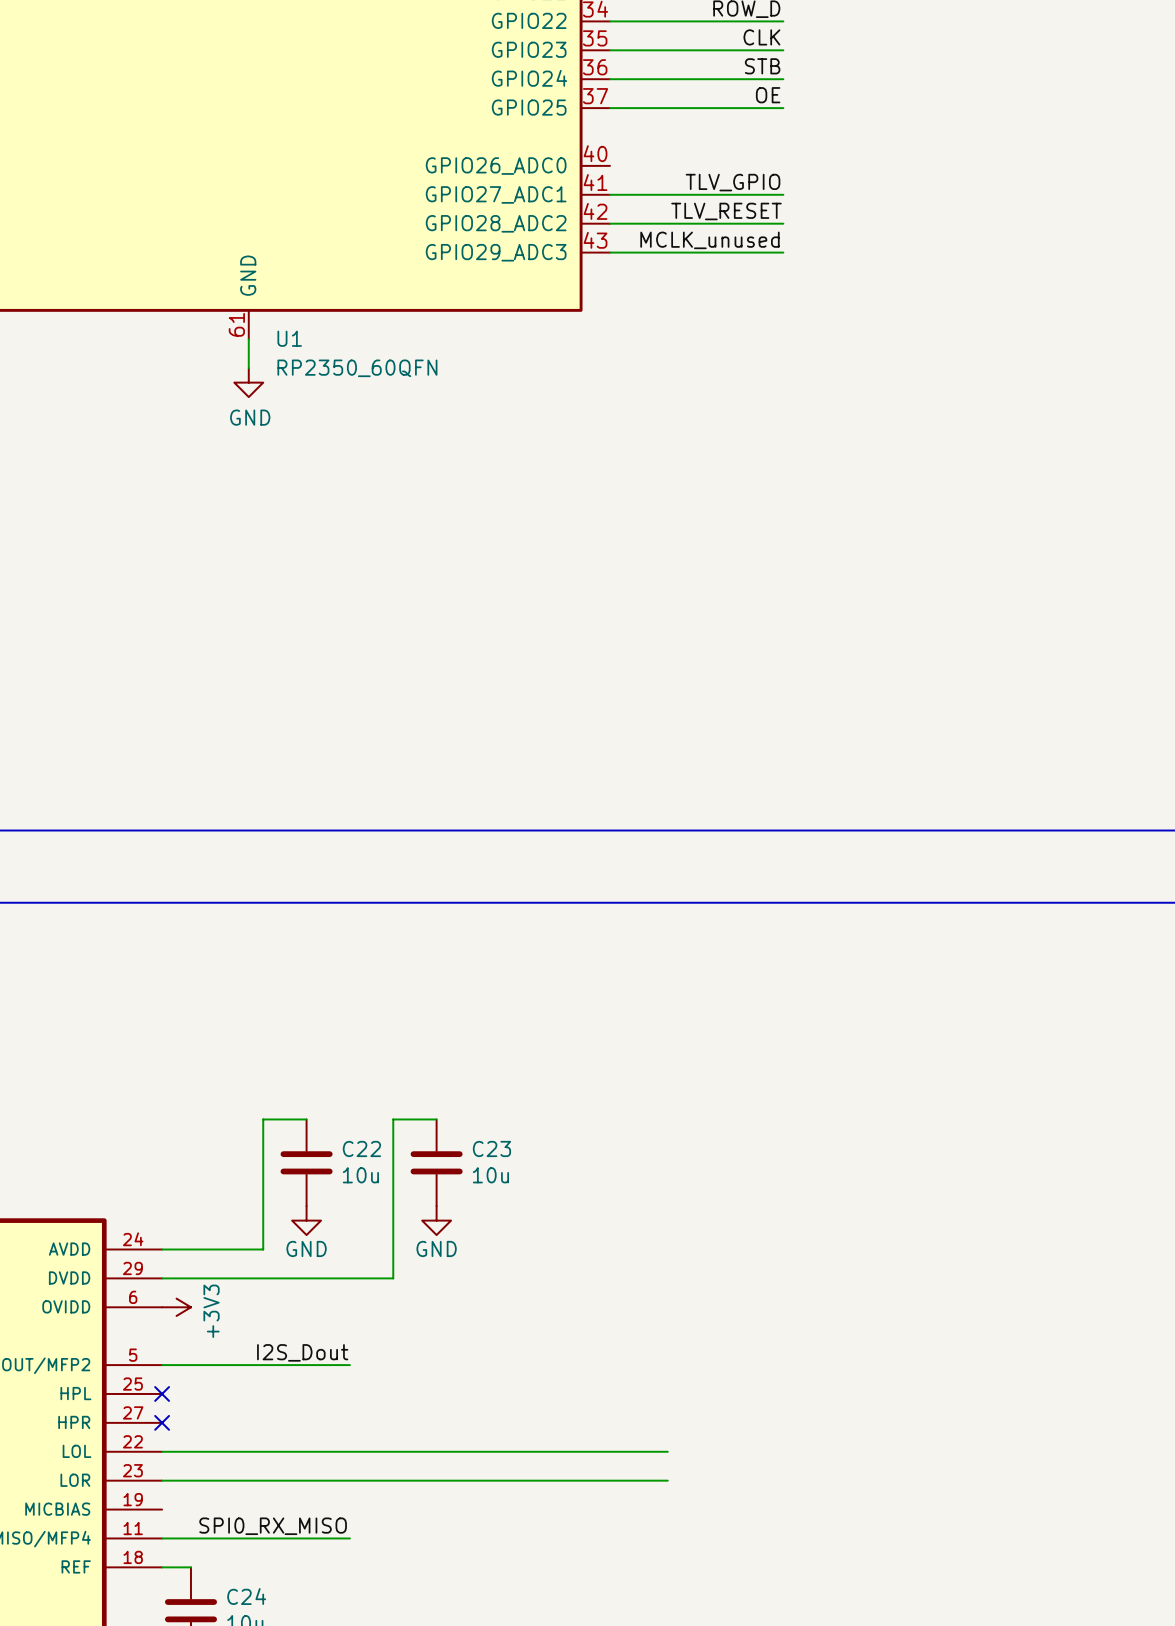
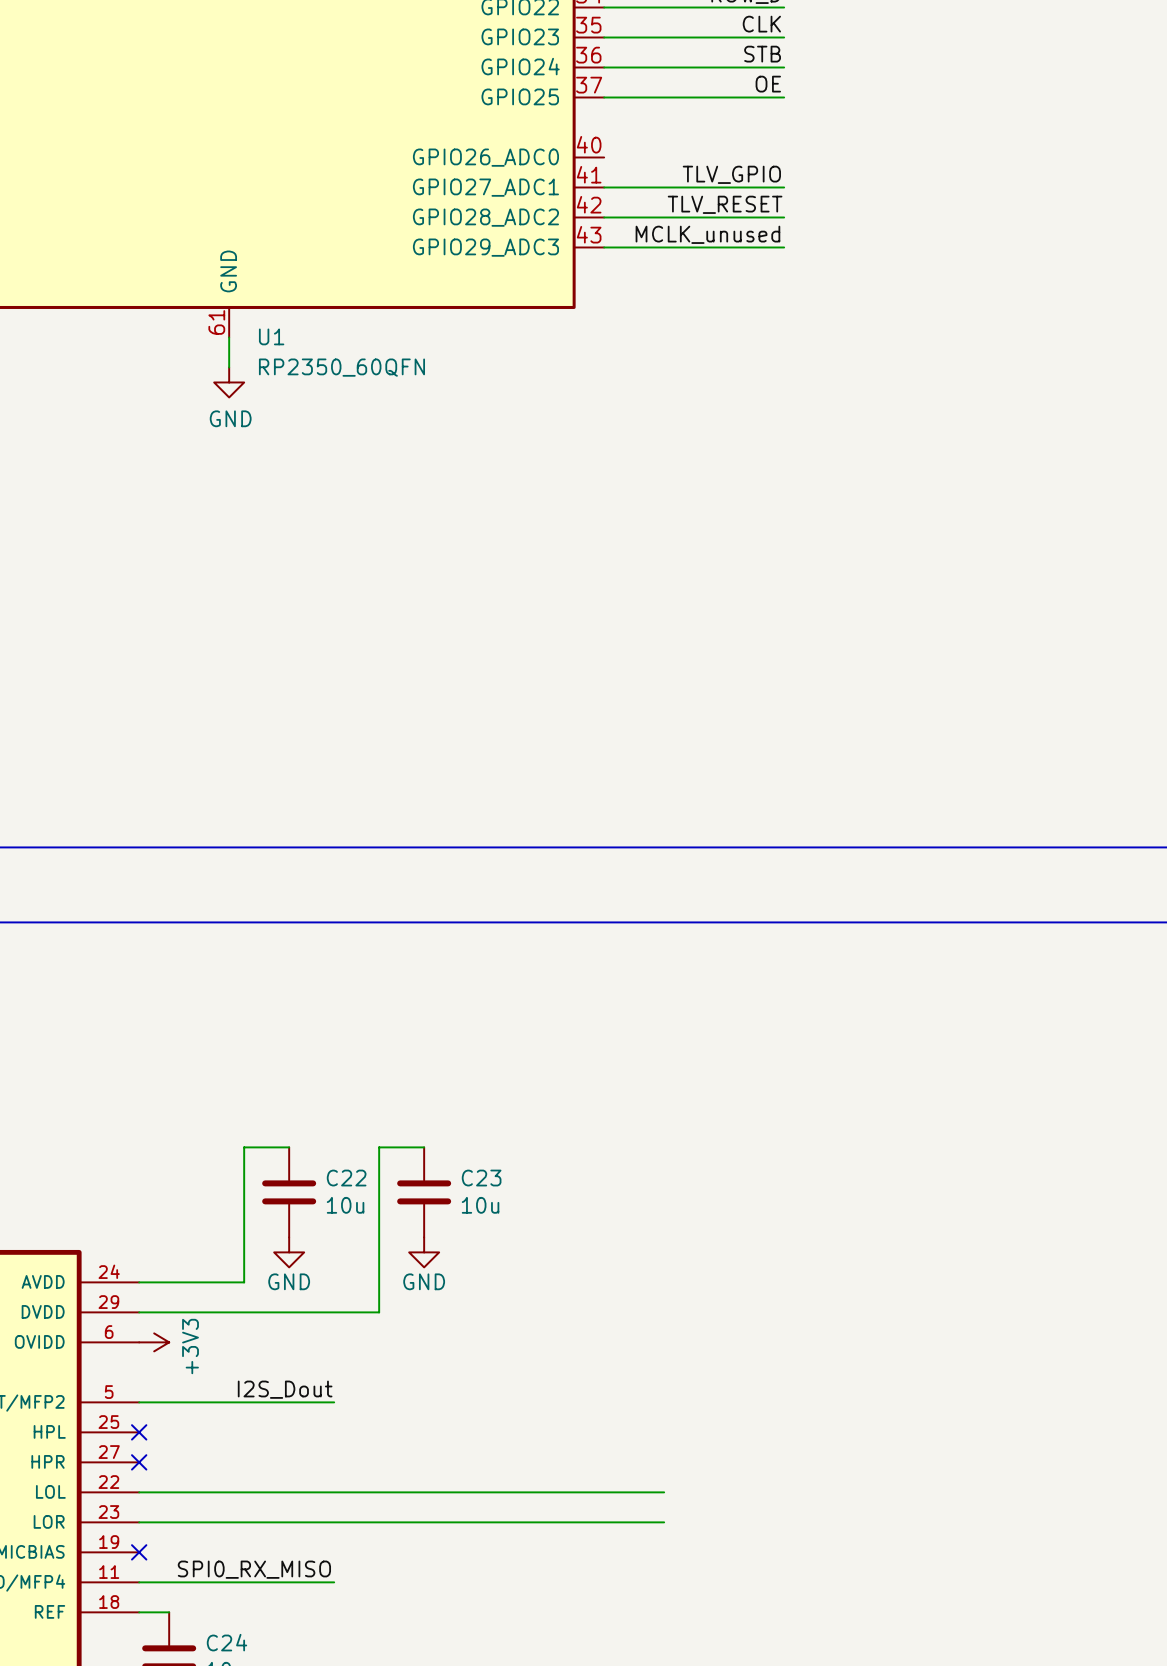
no-connect mark: none -> (139, 1552)

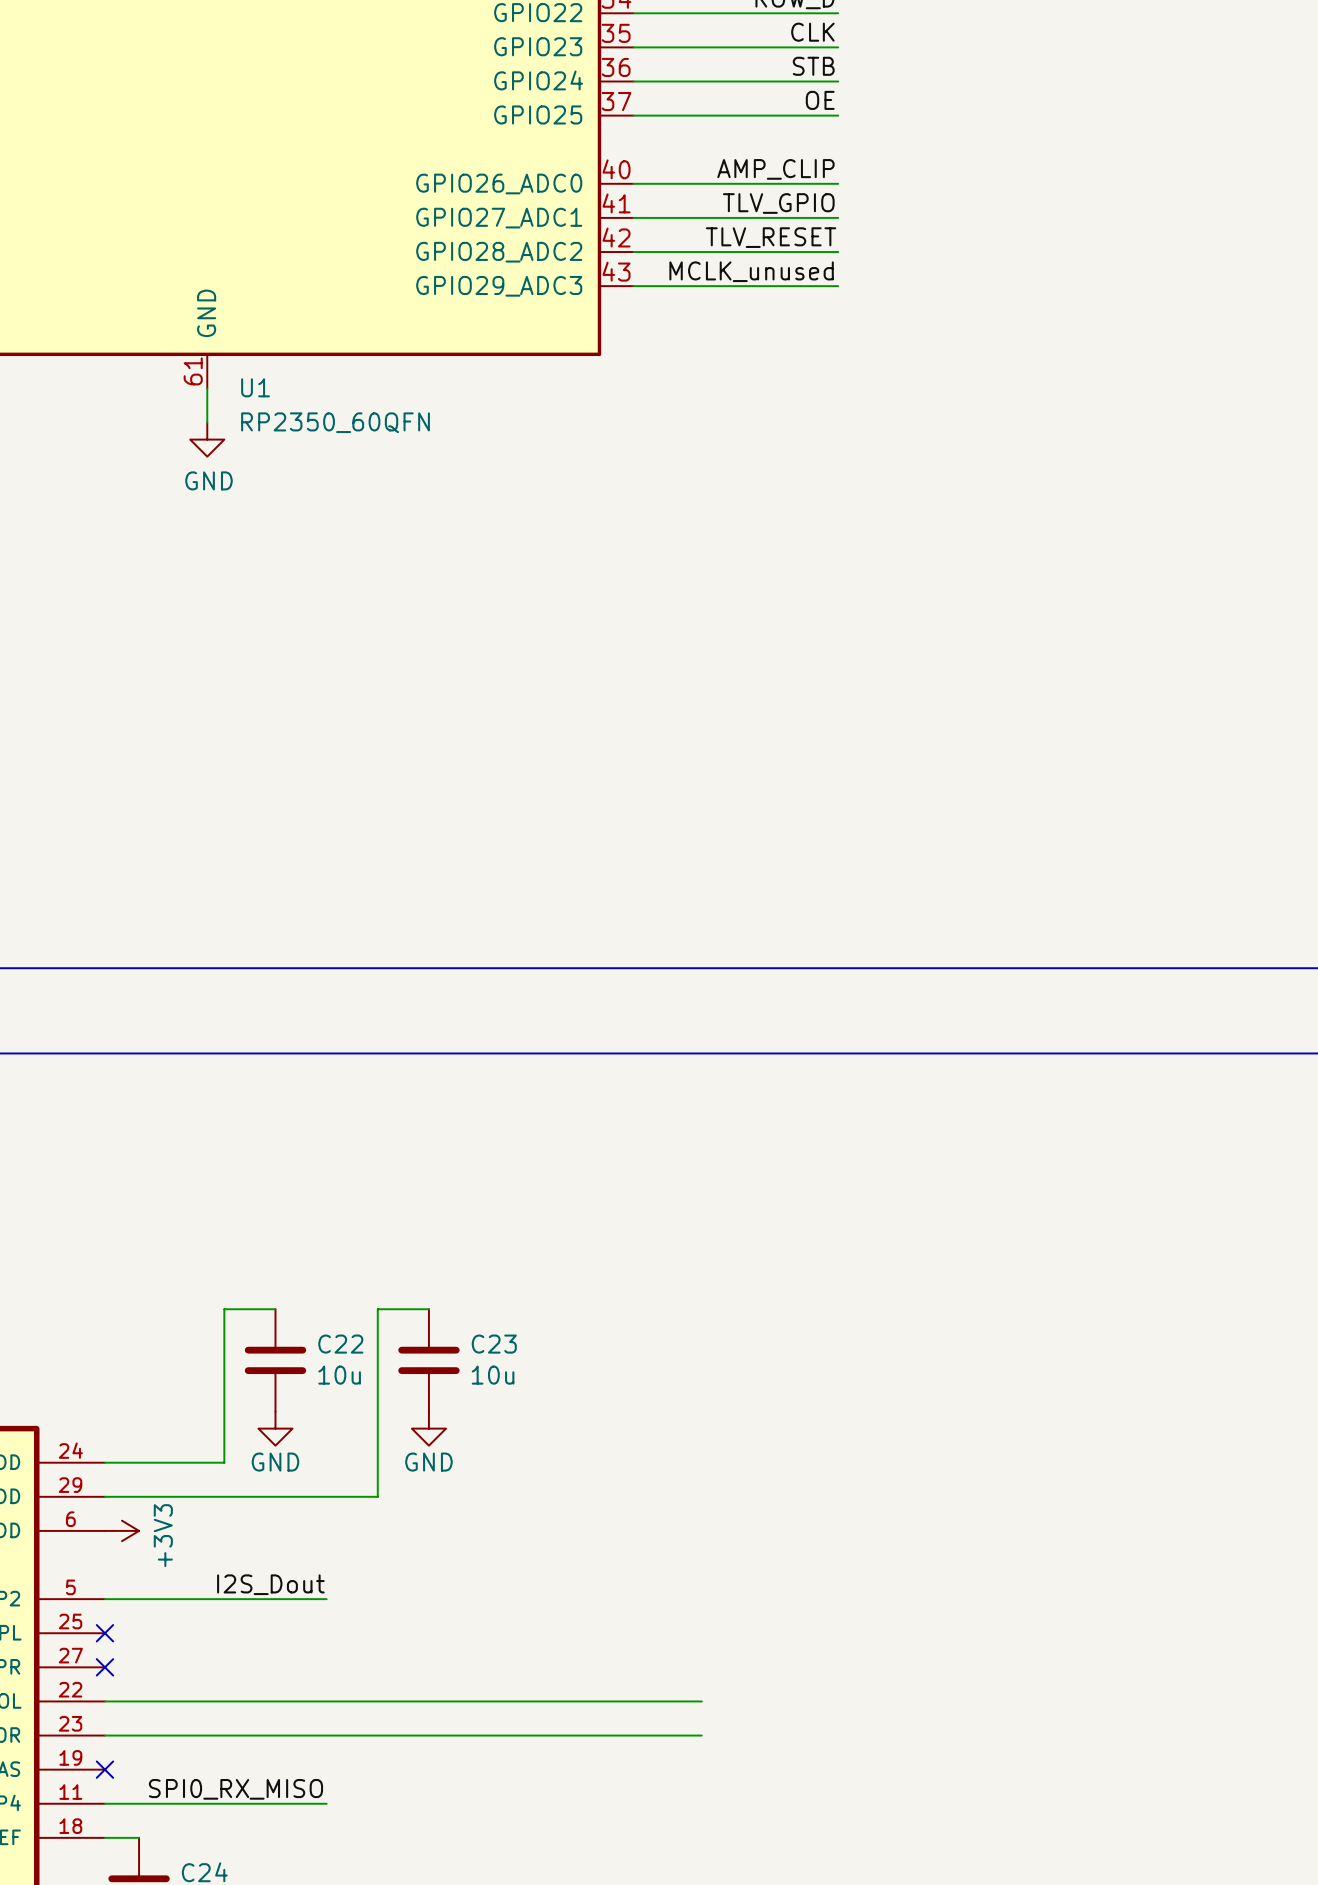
label: none -> AMP_CLIP (775, 169)
wire: none -> (633, 183) (838, 183)

